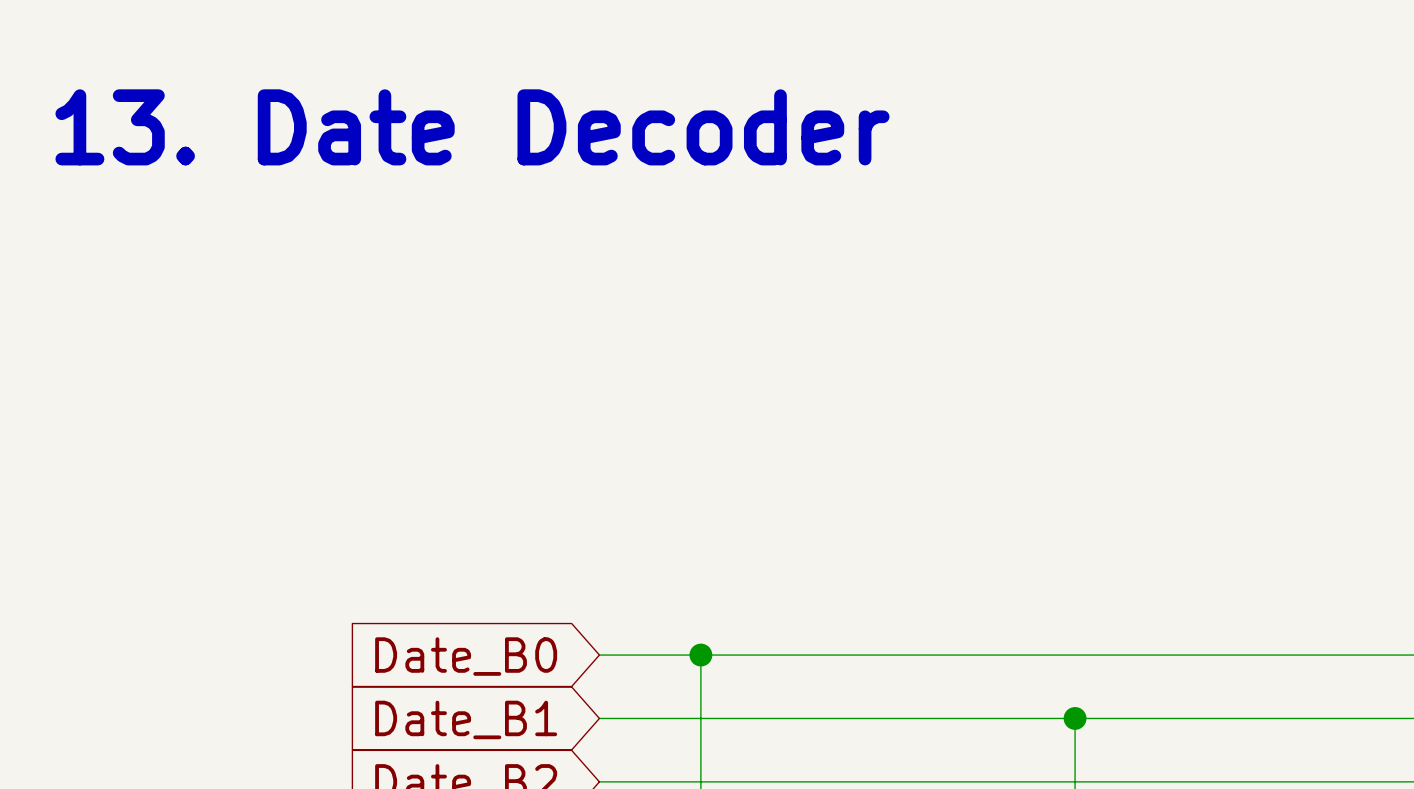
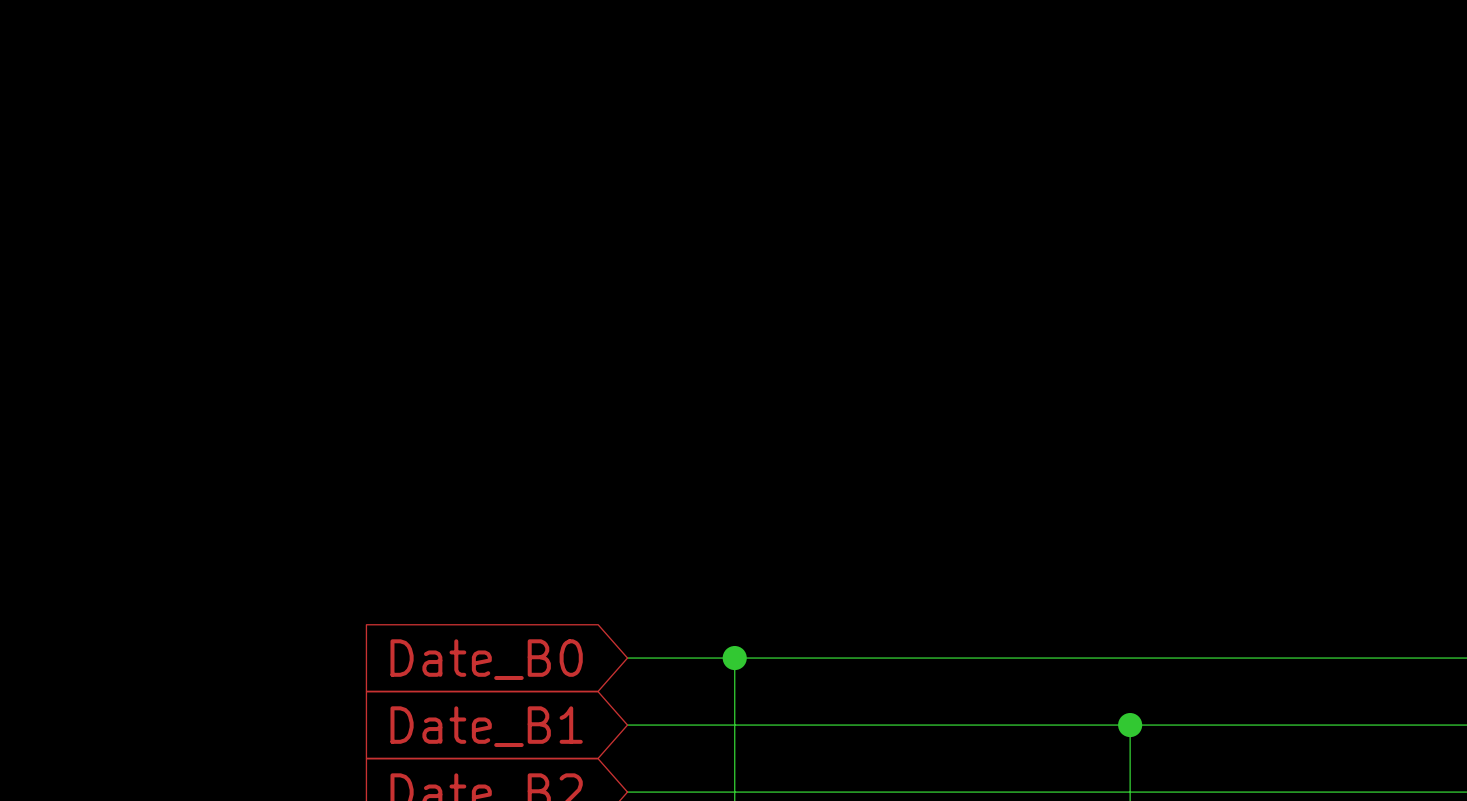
text: 13. Date Decoder (472, 127) -> none

